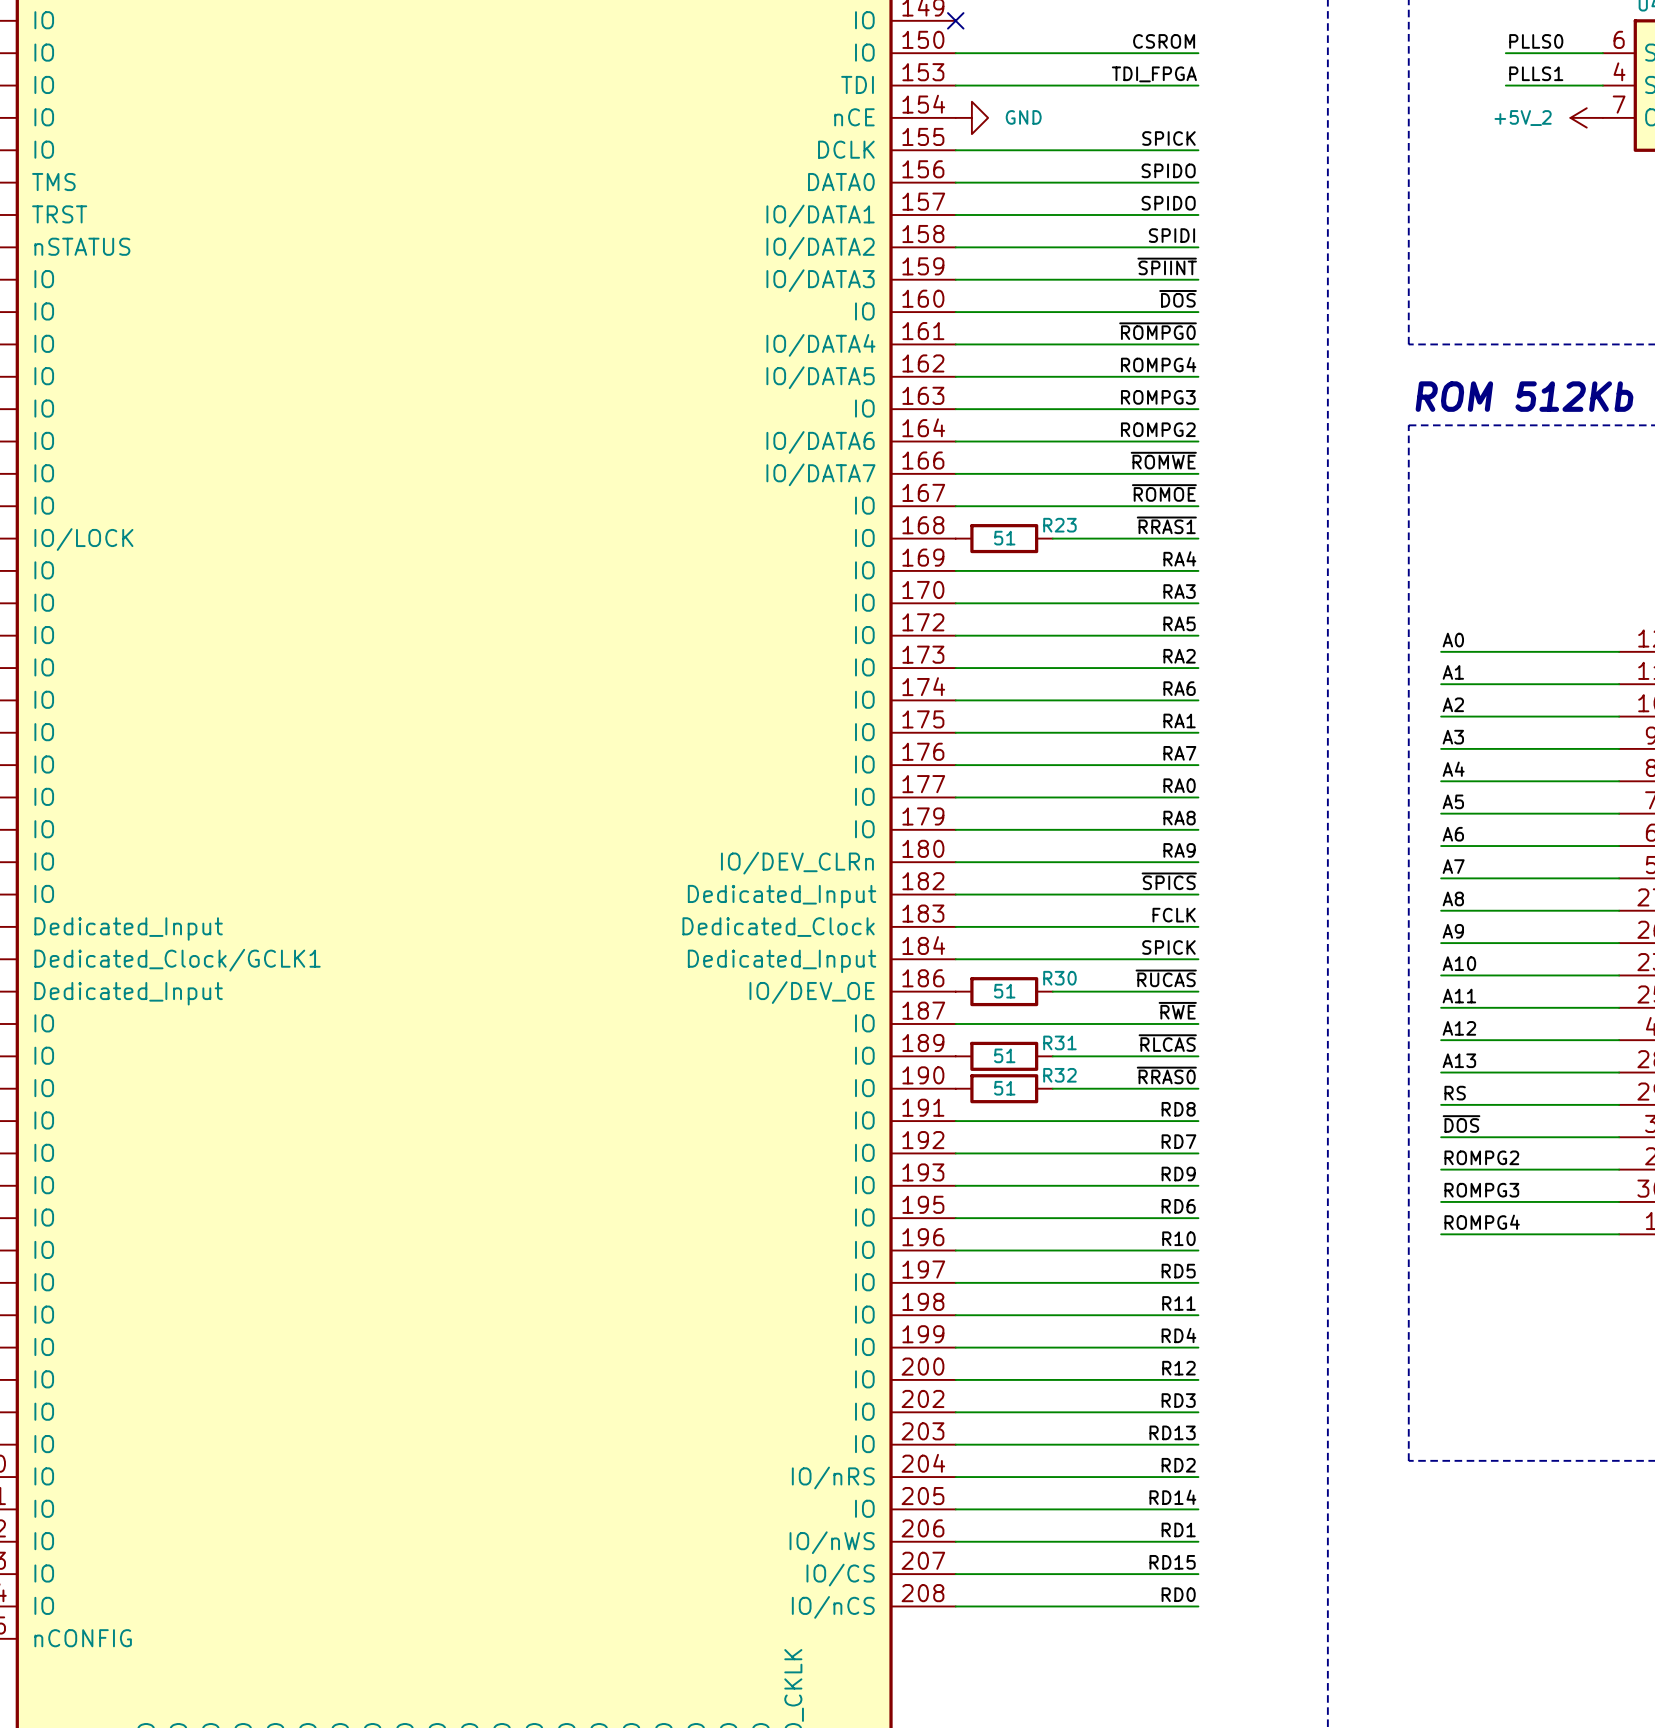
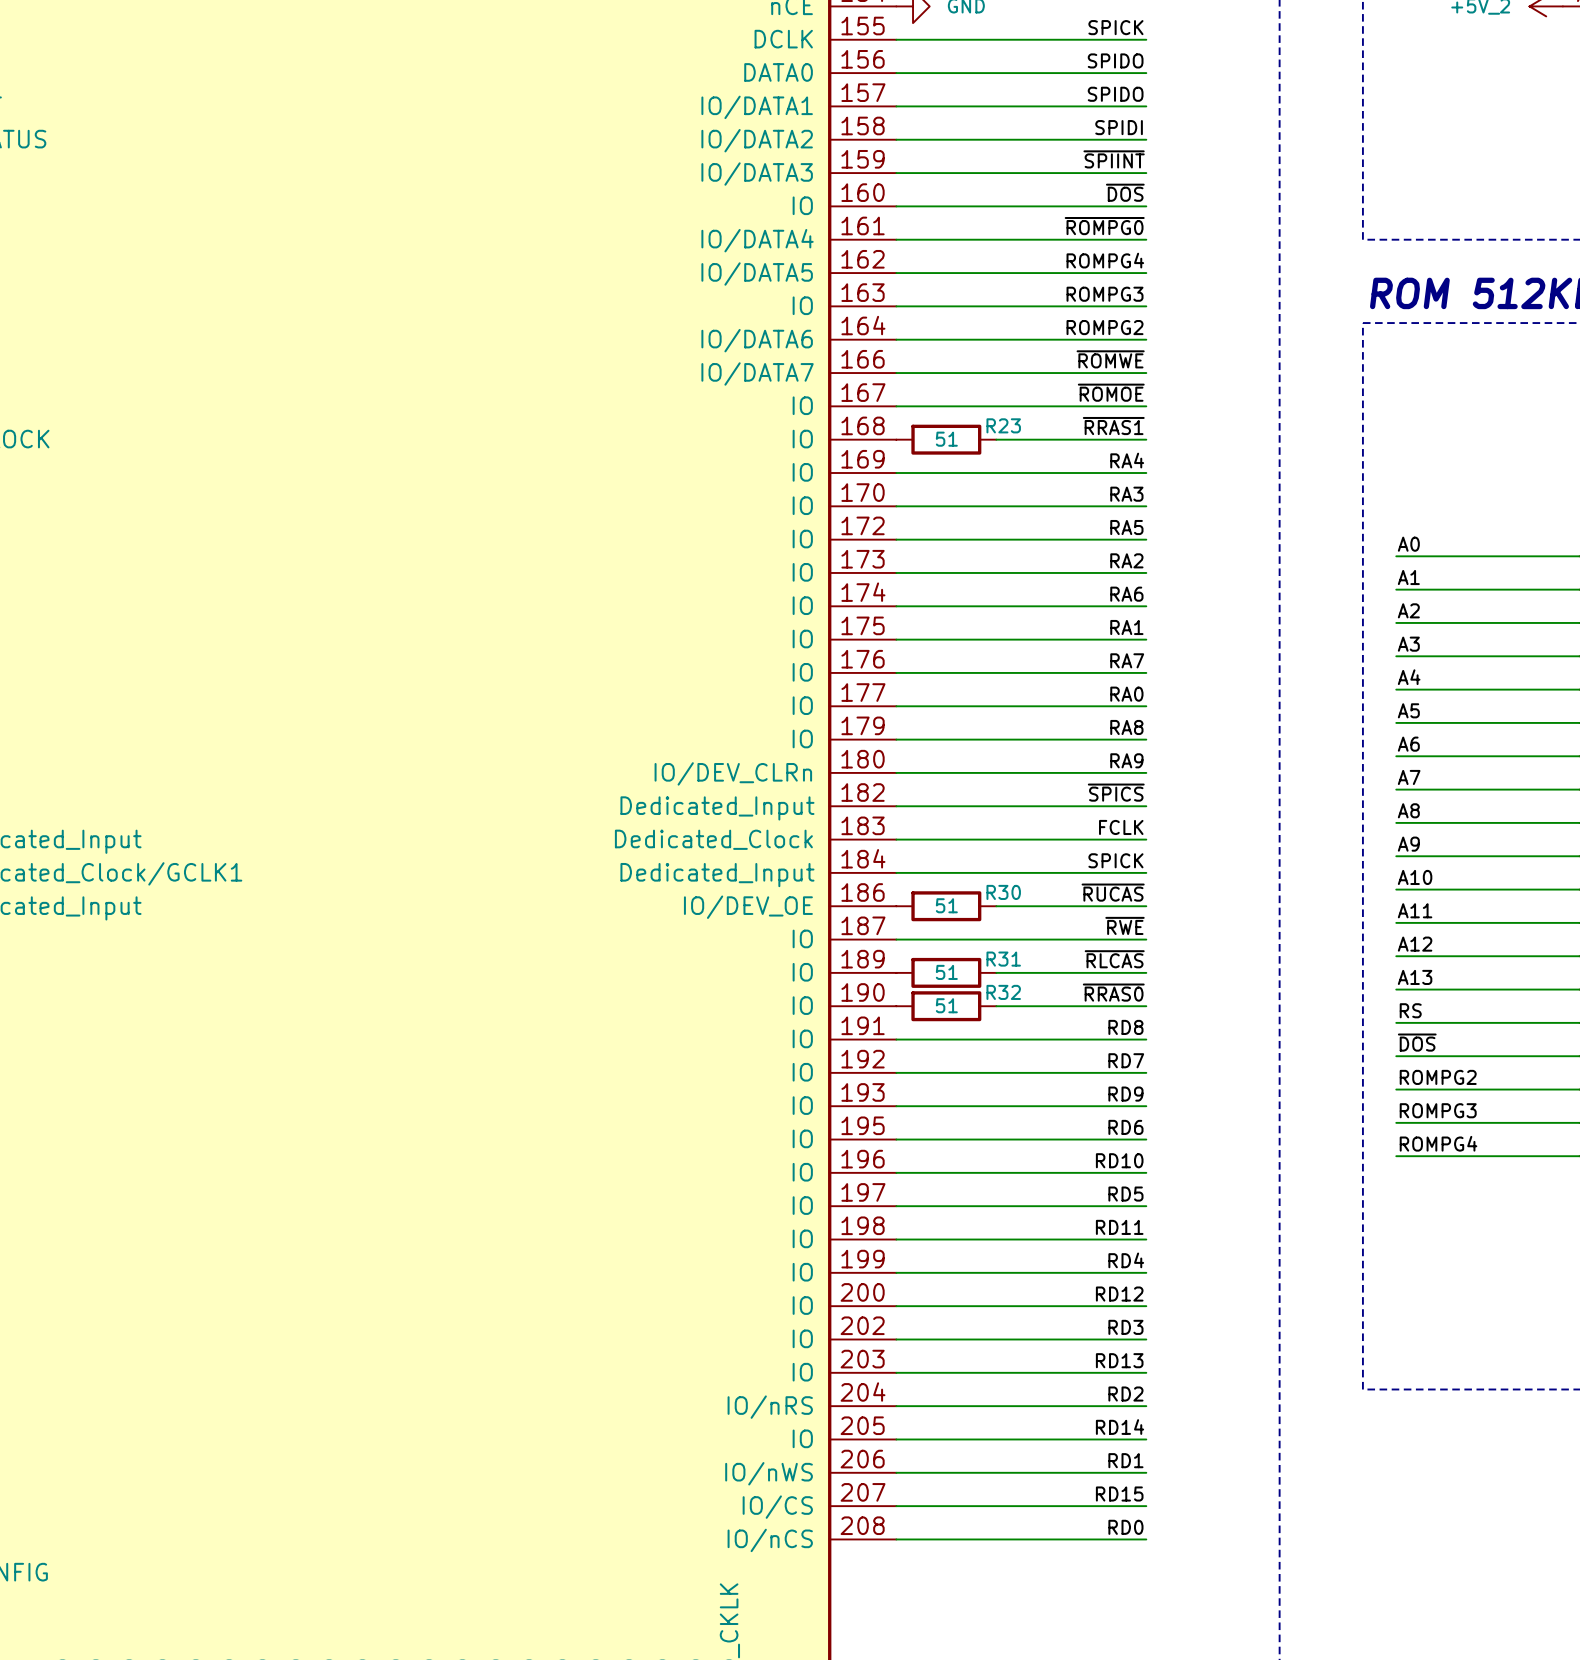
label: R10 (1178, 1238) -> RD10 (1119, 1160)
label: R11 (1178, 1303) -> RD11 (1119, 1227)
label: R12 (1178, 1368) -> RD12 (1119, 1294)

